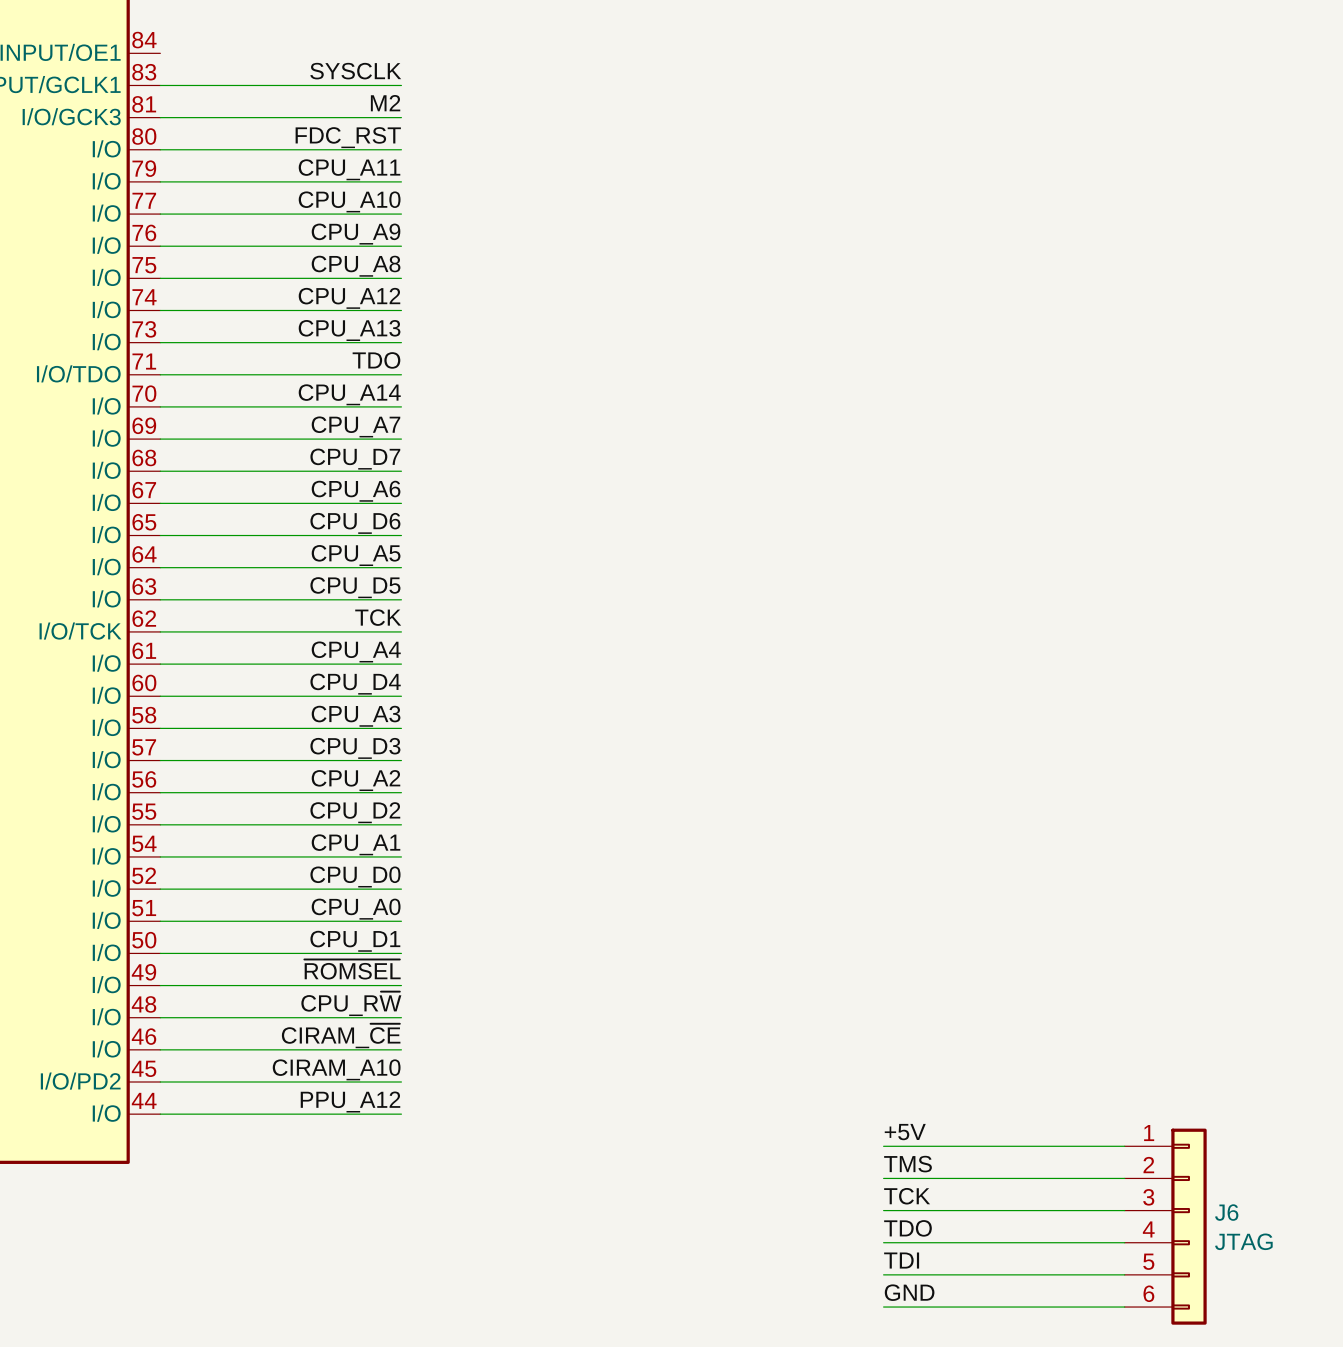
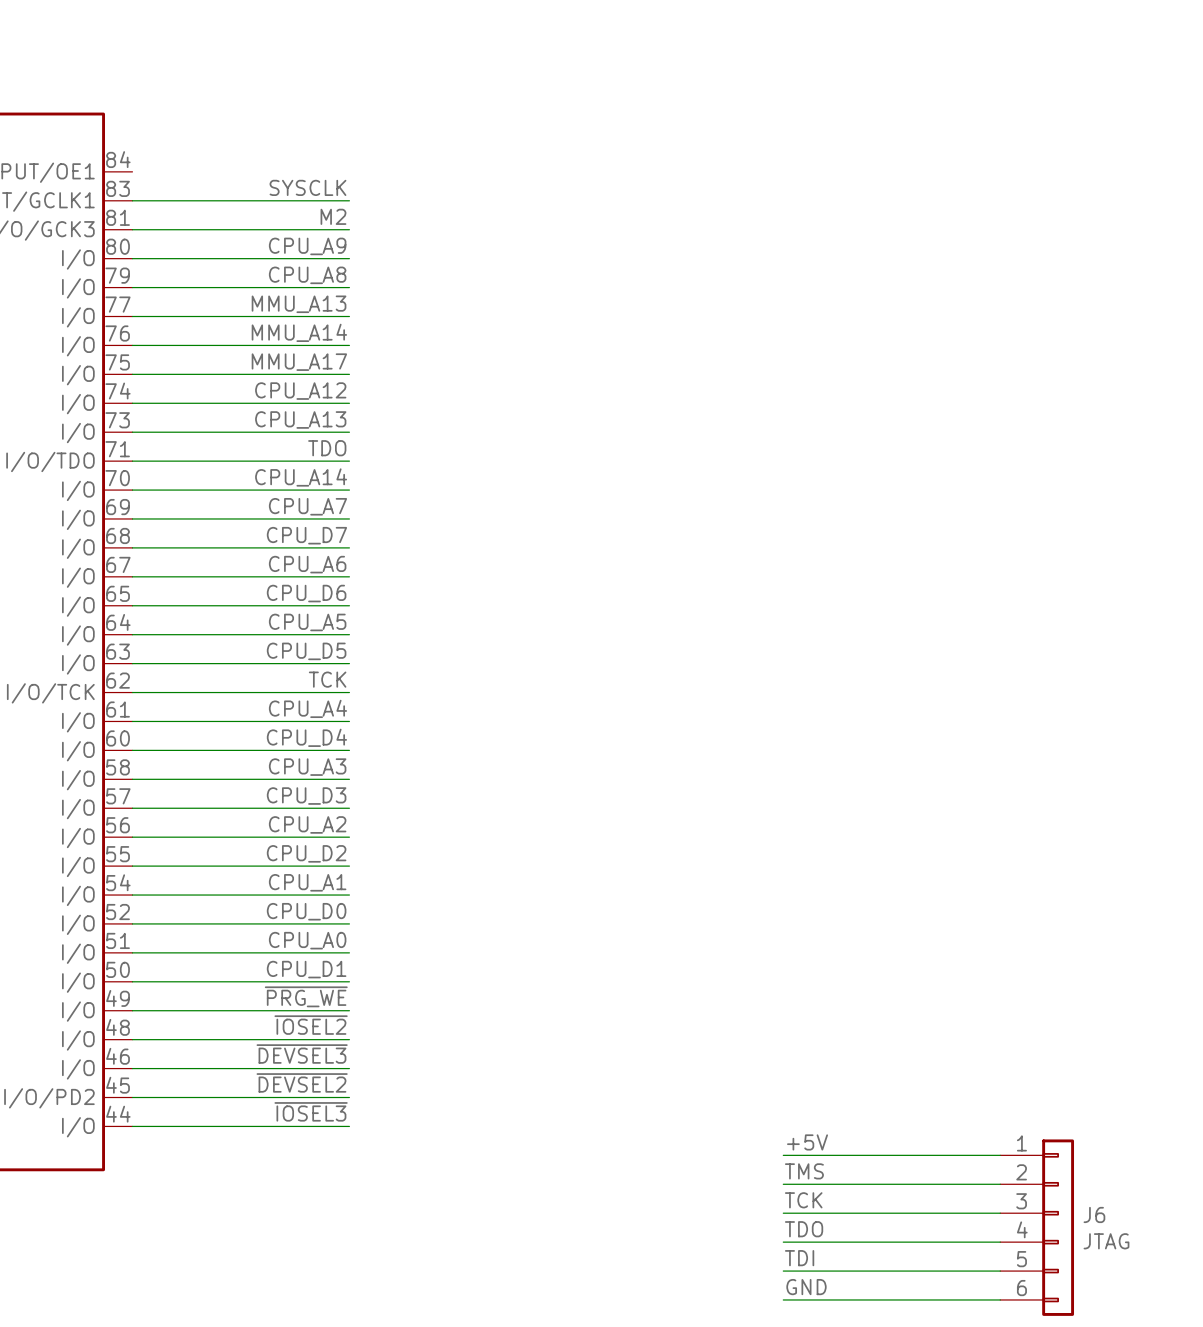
label: FDC_RST (348, 137) -> CPU_A9 (307, 246)
label: CPU_A11 (349, 169) -> CPU_A8 (307, 275)
label: CPU_A10 (349, 201) -> MMU_A13 (299, 304)
label: CPU_A9 (356, 234) -> MMU_A14 (299, 332)
label: CPU_A8 (356, 266) -> MMU_A17 (299, 362)
label: ~{ROMSEL} (352, 969) -> ~{PRG_WE} (306, 996)
label: CPU_R~{W} (351, 1003) -> ~{IOSEL2} (311, 1025)
label: CIRAM_~{CE} (341, 1035) -> ~{DEVSEL3} (302, 1054)
label: CIRAM_A10 (336, 1069) -> ~{DEVSEL2} (302, 1082)
label: PPU_A12 (350, 1102) -> ~{IOSEL3} (311, 1111)

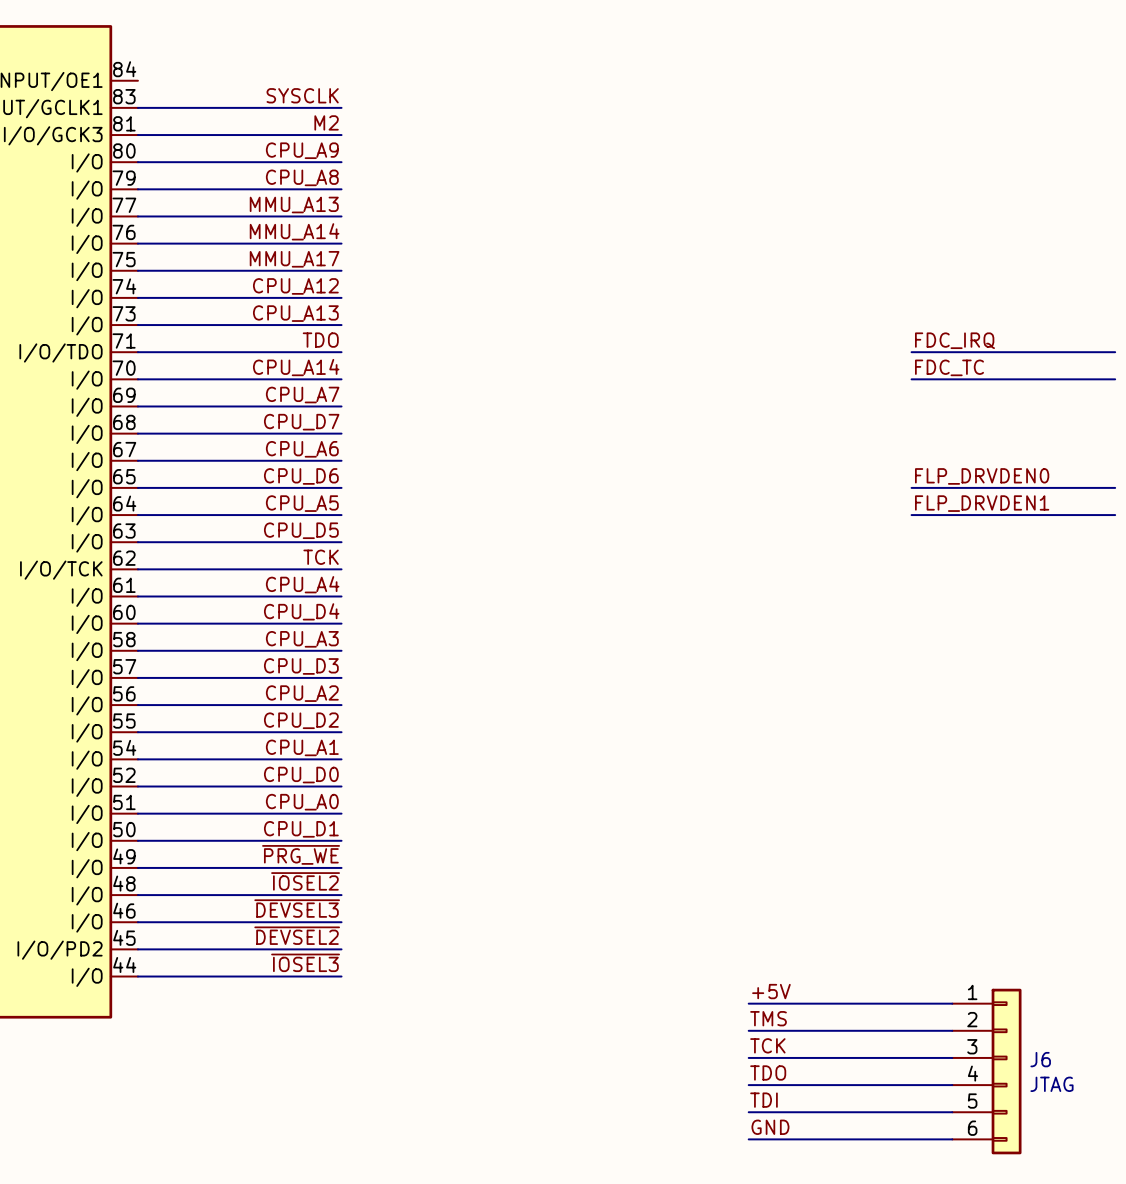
label: none -> FDC_IRQ (954, 340)
wire: none -> (911, 352) (1115, 352)
label: none -> FDC_TC (949, 367)
wire: none -> (911, 379) (1115, 379)
label: none -> FLP_DRVDEN0 (982, 476)
wire: none -> (911, 487) (1115, 487)
label: none -> FLP_DRVDEN1 (982, 503)
wire: none -> (911, 515) (1115, 515)

